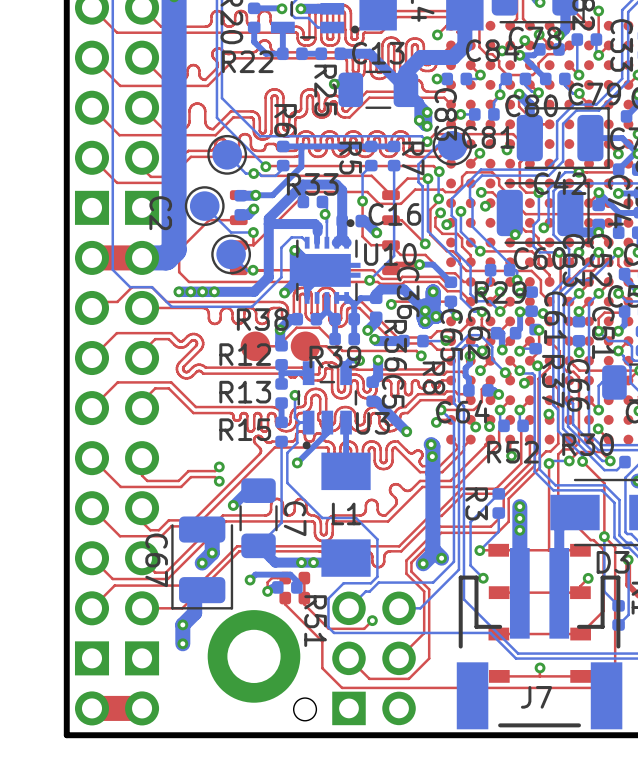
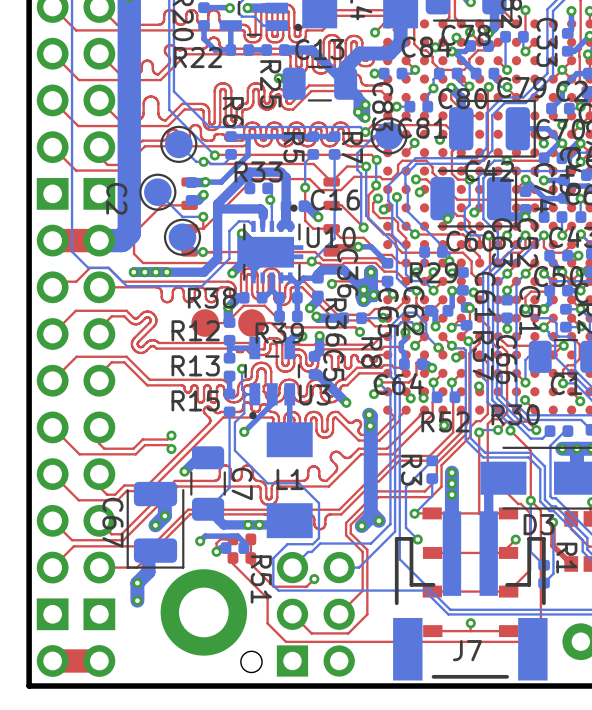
top track: none -> (488, 87) (487, 156) (483, 160) (471, 160) (461, 171)
via: none -> (488, 87)

